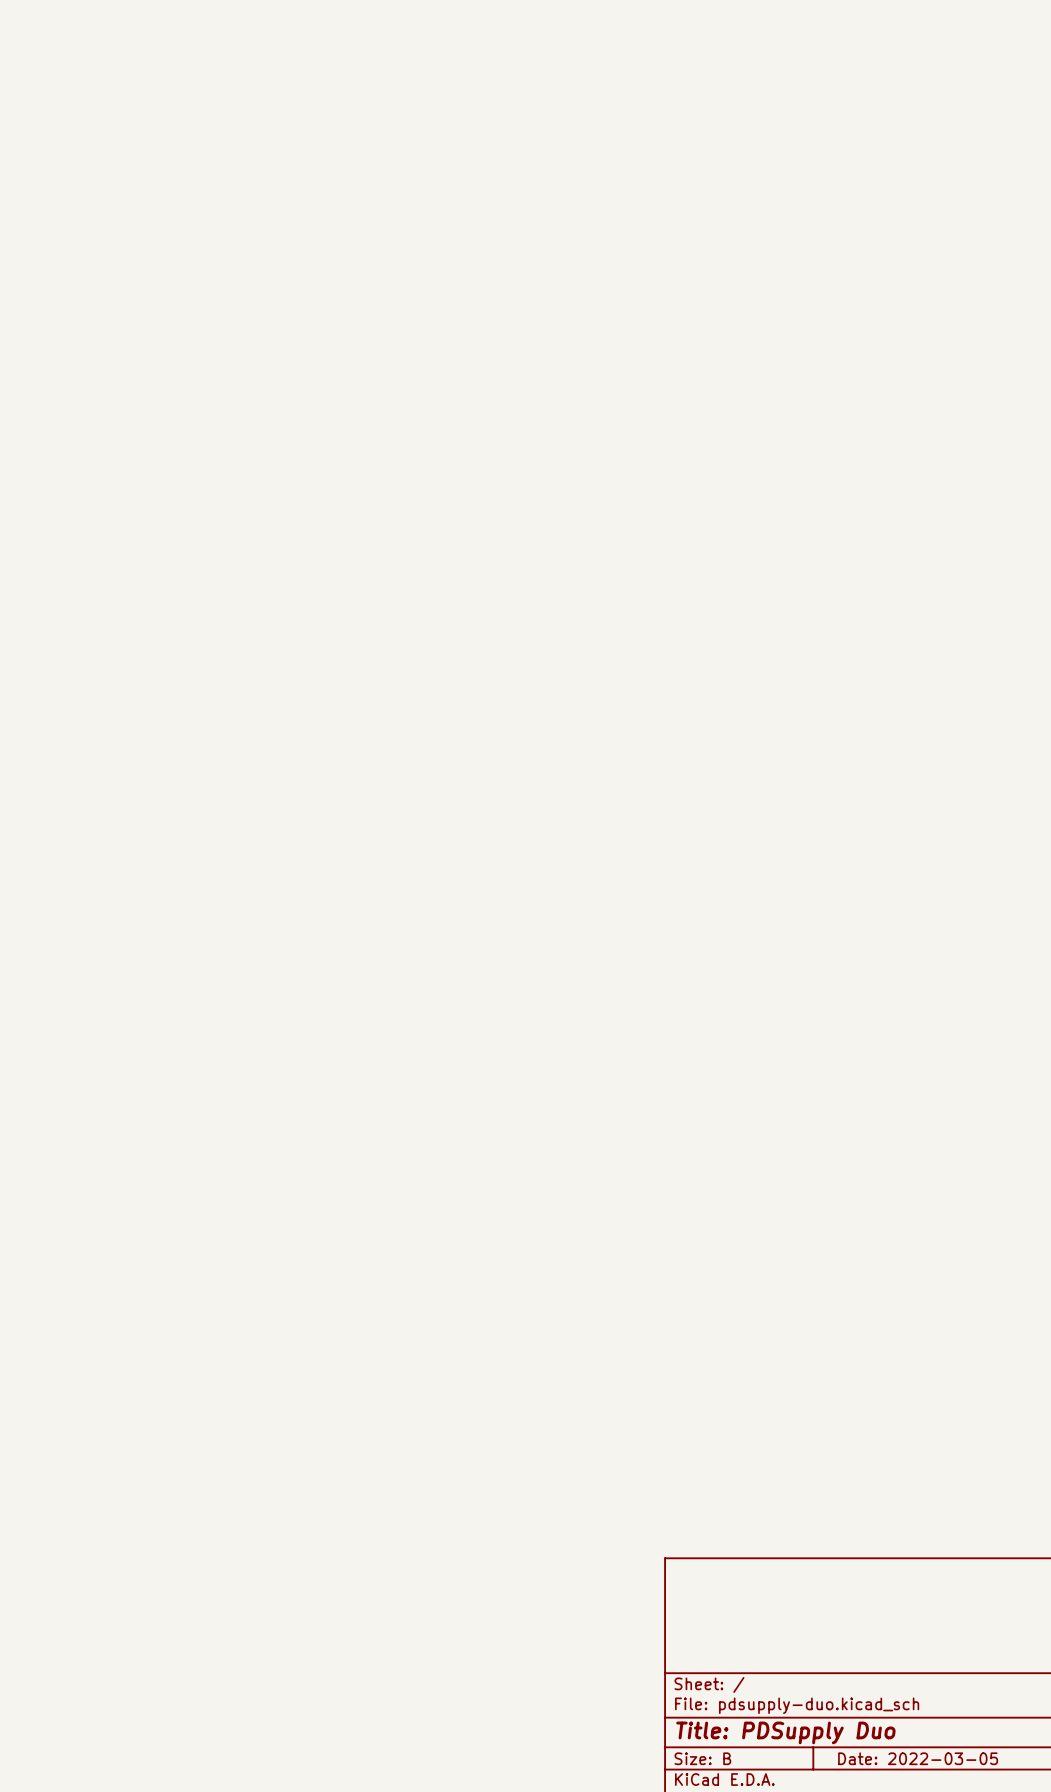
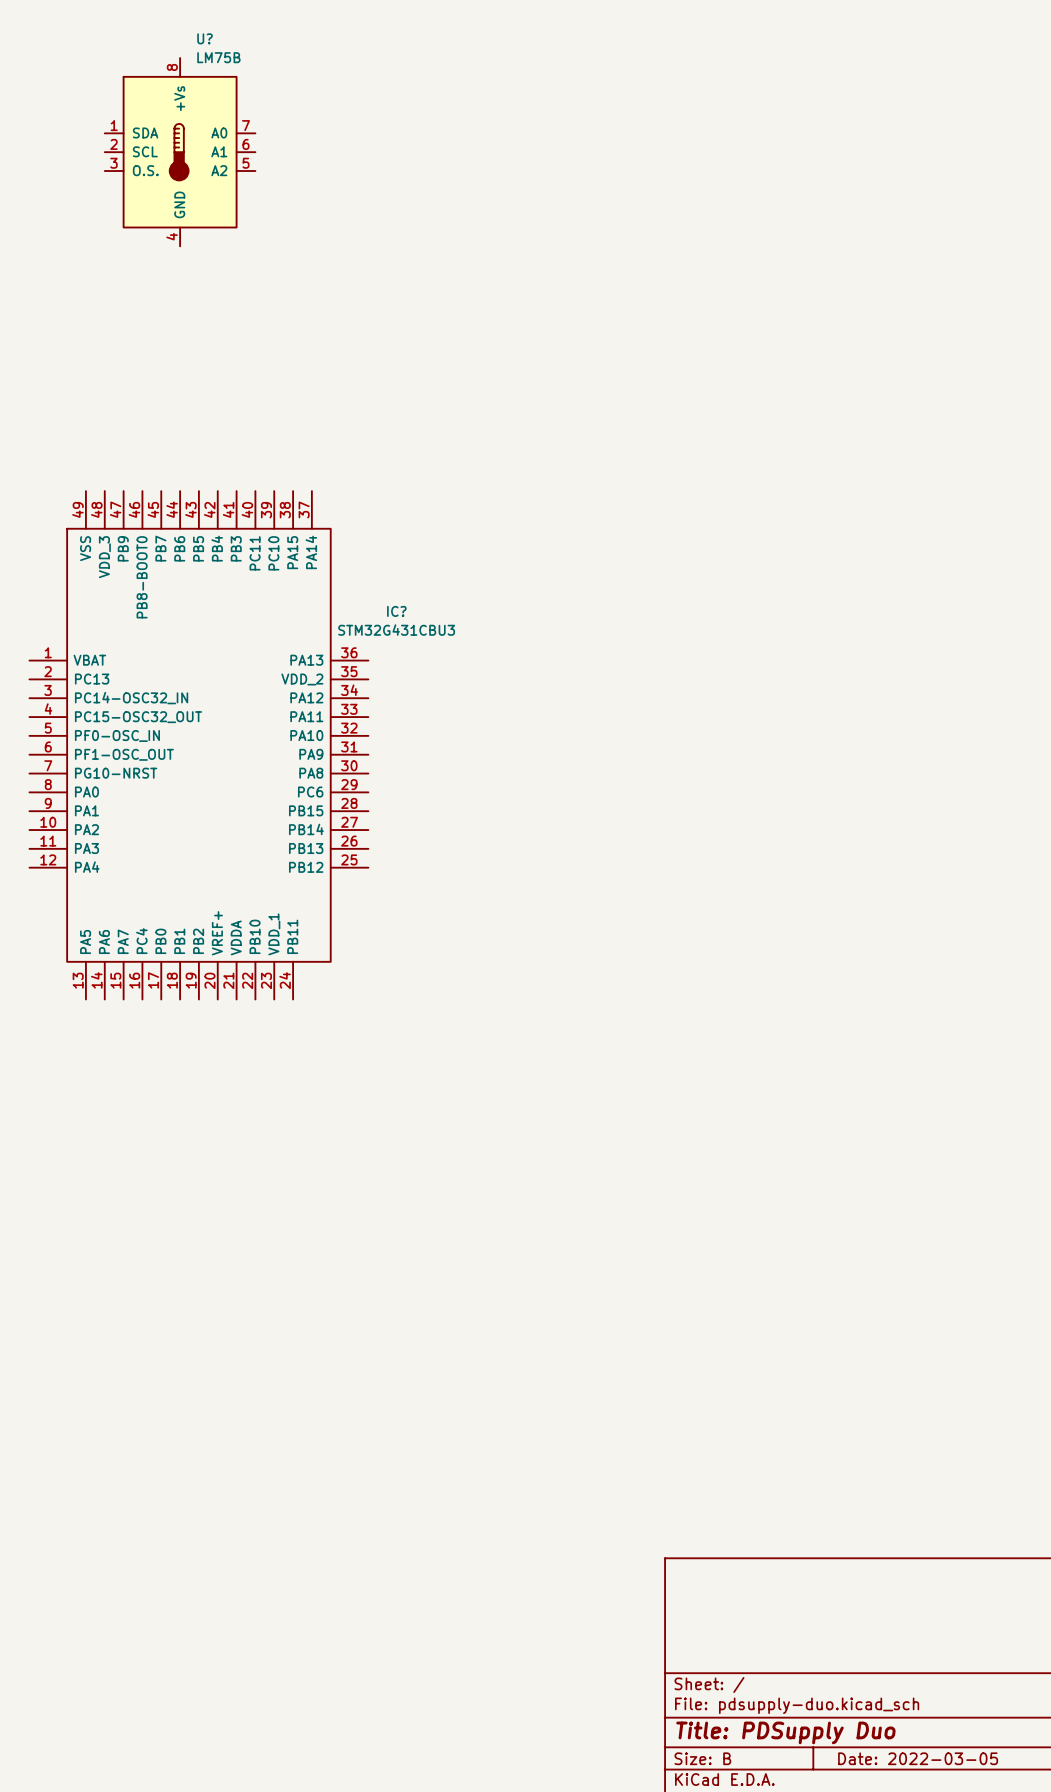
U?: none -> LM75B (180, 152)
IC?: none -> STM32G431CBU3 (198, 745)

